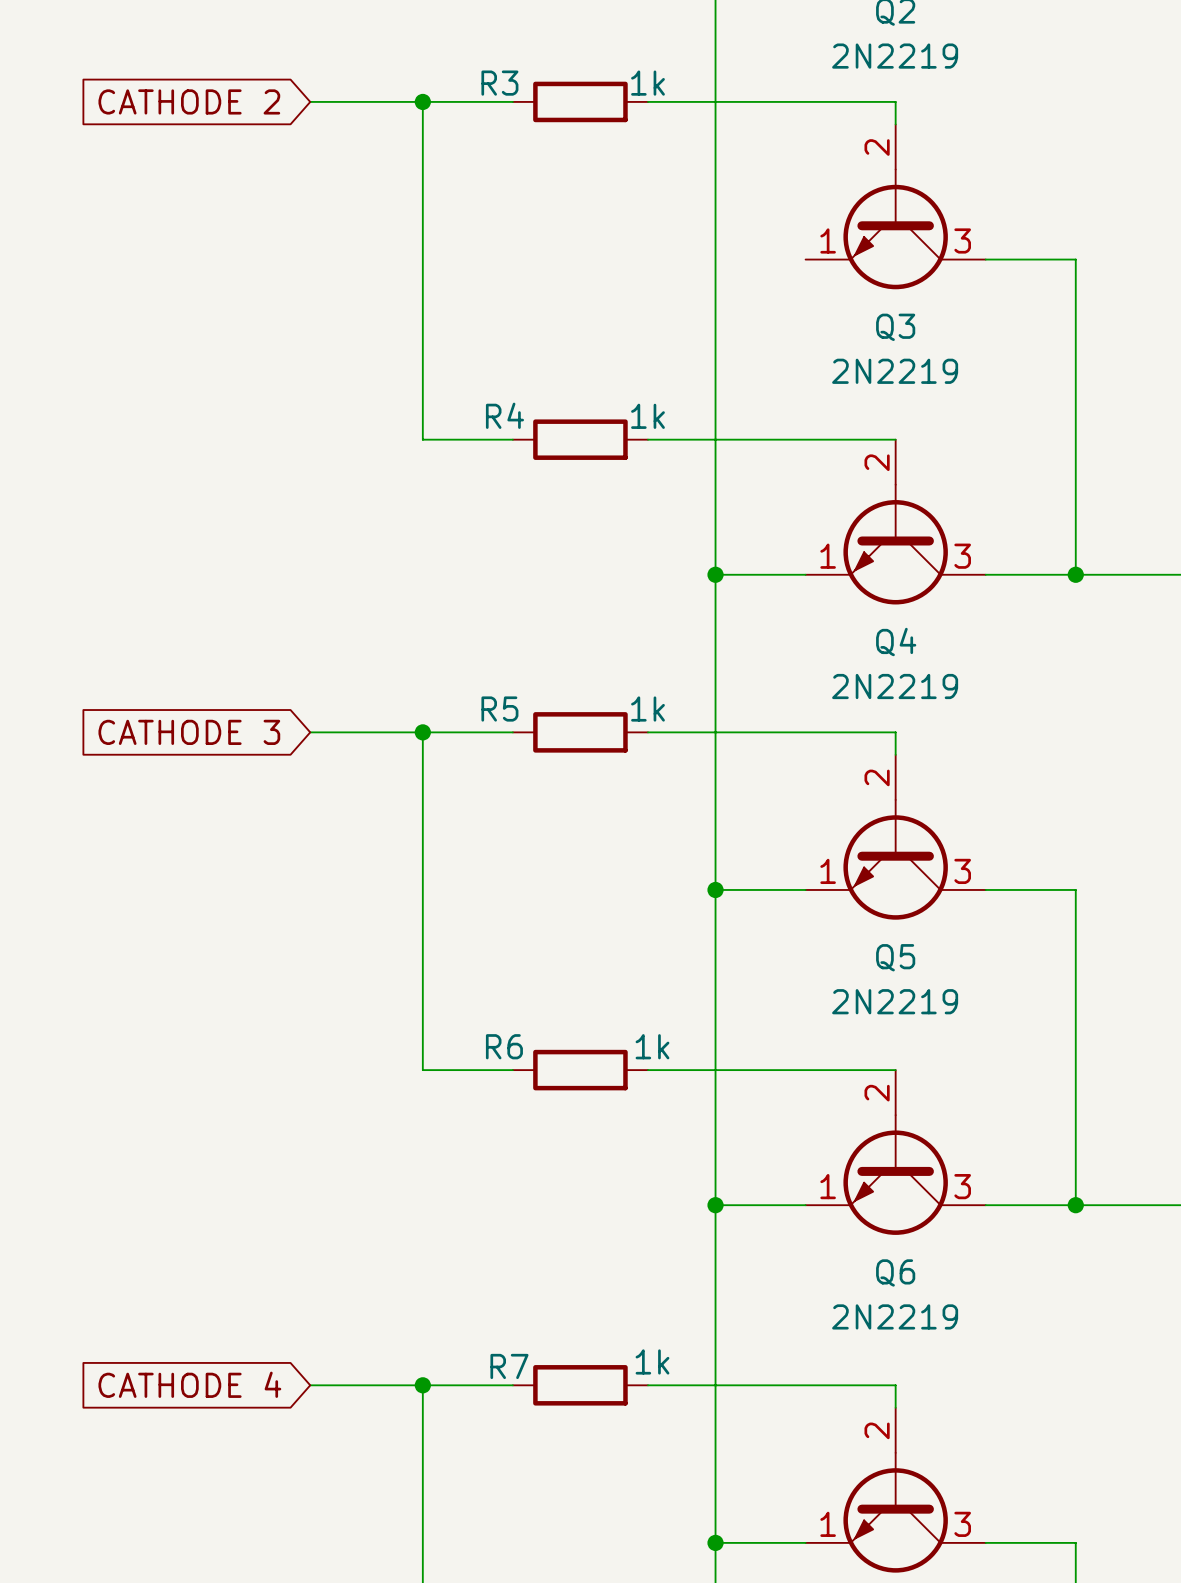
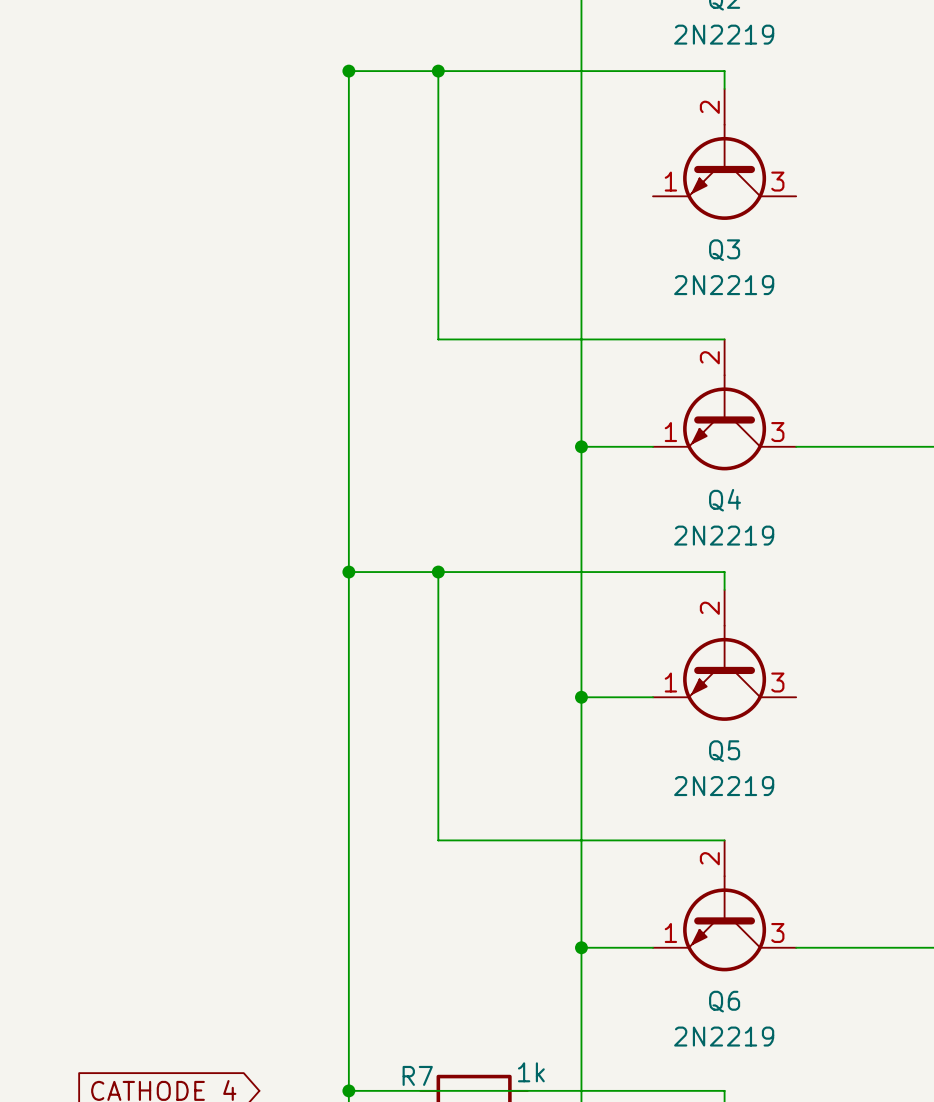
global label: CATHODE 2 (189, 101) -> none
wire: (310, 101) (422, 101) -> none
wire: none -> (420, 71) (527, 71)
wire: none -> (438, 71) (438, 339) (527, 339)
junction: none -> (438, 71)
R3: 1k (580, 101) -> none
wire: (985, 259) (1075, 259) (1075, 574) -> none
wire: (422, 439) (512, 439) -> (348, 339) (348, 572)
R4: 1k (580, 439) -> none
junction: (1075, 574) -> none
global label: CATHODE 3 (189, 732) -> none
wire: (310, 732) (422, 732) -> none
wire: none -> (420, 572) (527, 572)
wire: none -> (438, 572) (438, 840) (527, 840)
junction: none -> (438, 572)
R5: 1k (580, 732) -> none
wire: (985, 889) (1075, 889) (1075, 1205) -> none
wire: (422, 1070) (512, 1070) -> (348, 840) (348, 1090)
R6: 1k (580, 1070) -> none
junction: (1075, 1205) -> none
wire: (310, 1385) (422, 1385) -> none
wire: none -> (420, 1090) (527, 1090)

